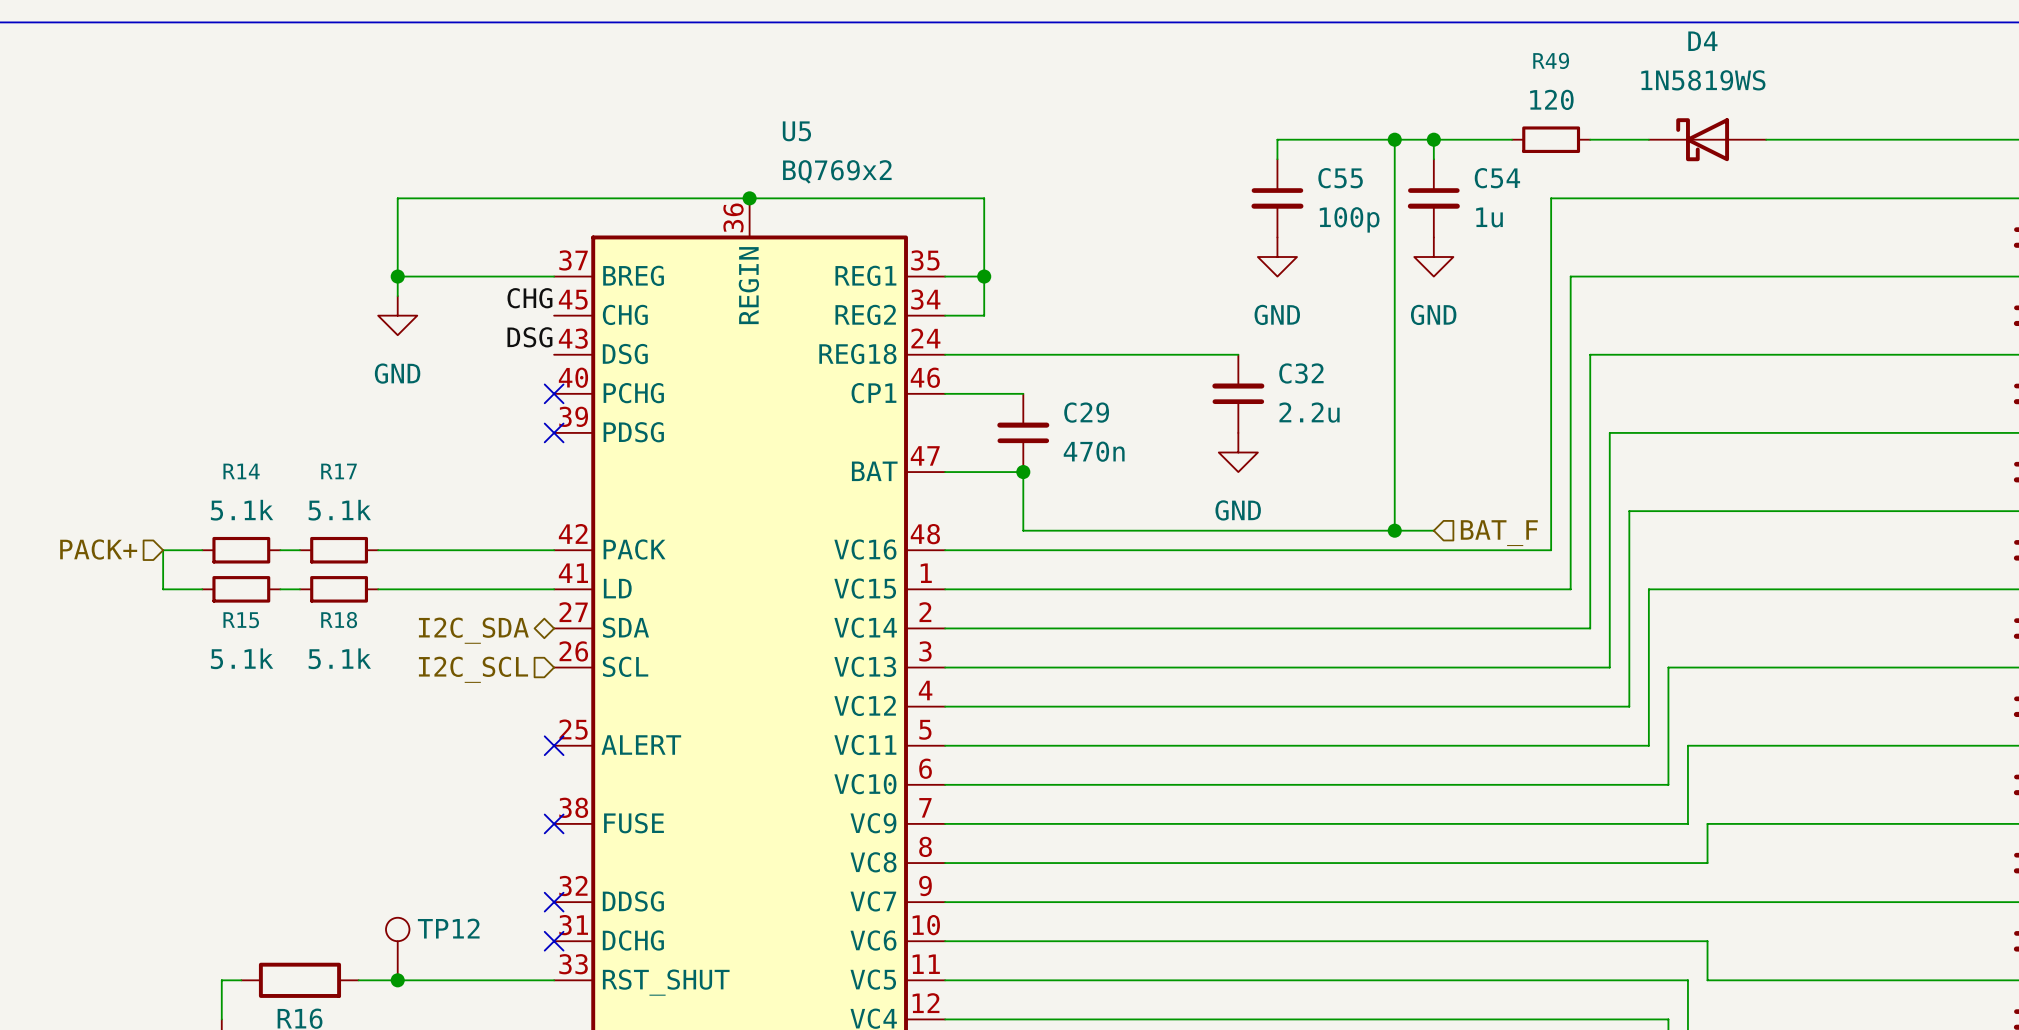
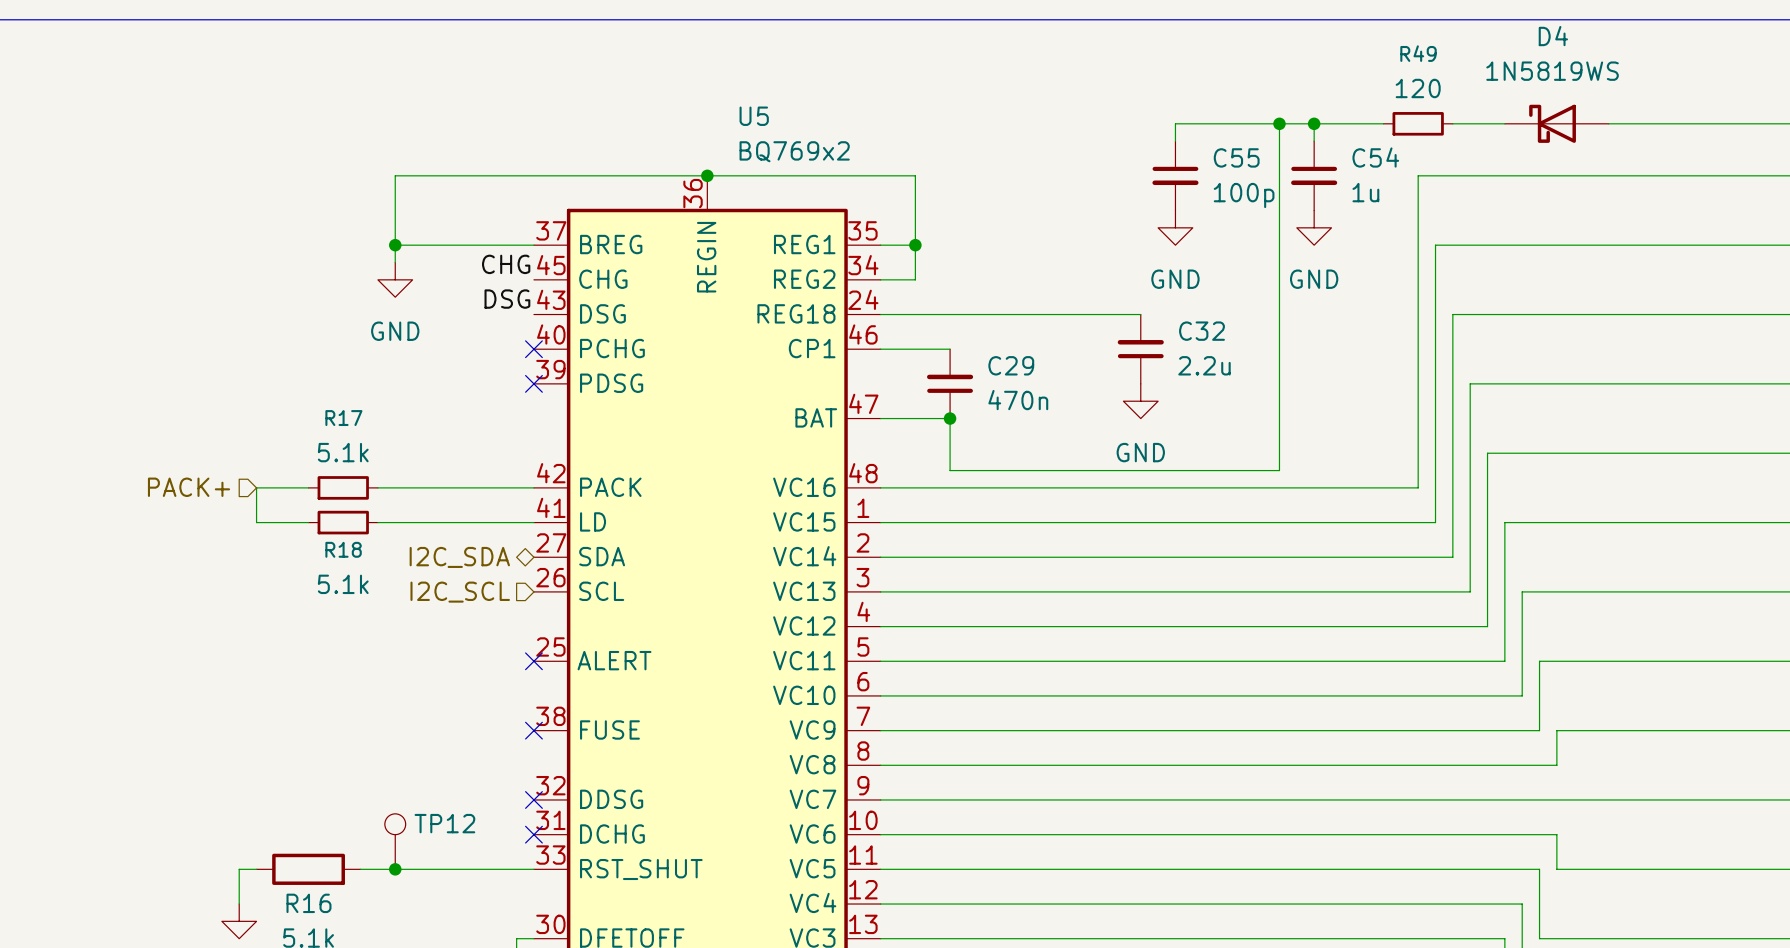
wire: (1394, 530) (1433, 530) -> none
junction: (1394, 530) -> none
hierarchical label: BAT_F (1499, 533) -> none
hierarchical label position: PACK+ (98, 549) -> PACK+ (189, 487)
wire: (202, 550) (163, 550) (163, 589) (202, 589) -> (291, 487) (256, 487) (256, 522) (291, 522)
R14: 5.1k (241, 550) -> none
R15: 5.1k (241, 589) -> none

